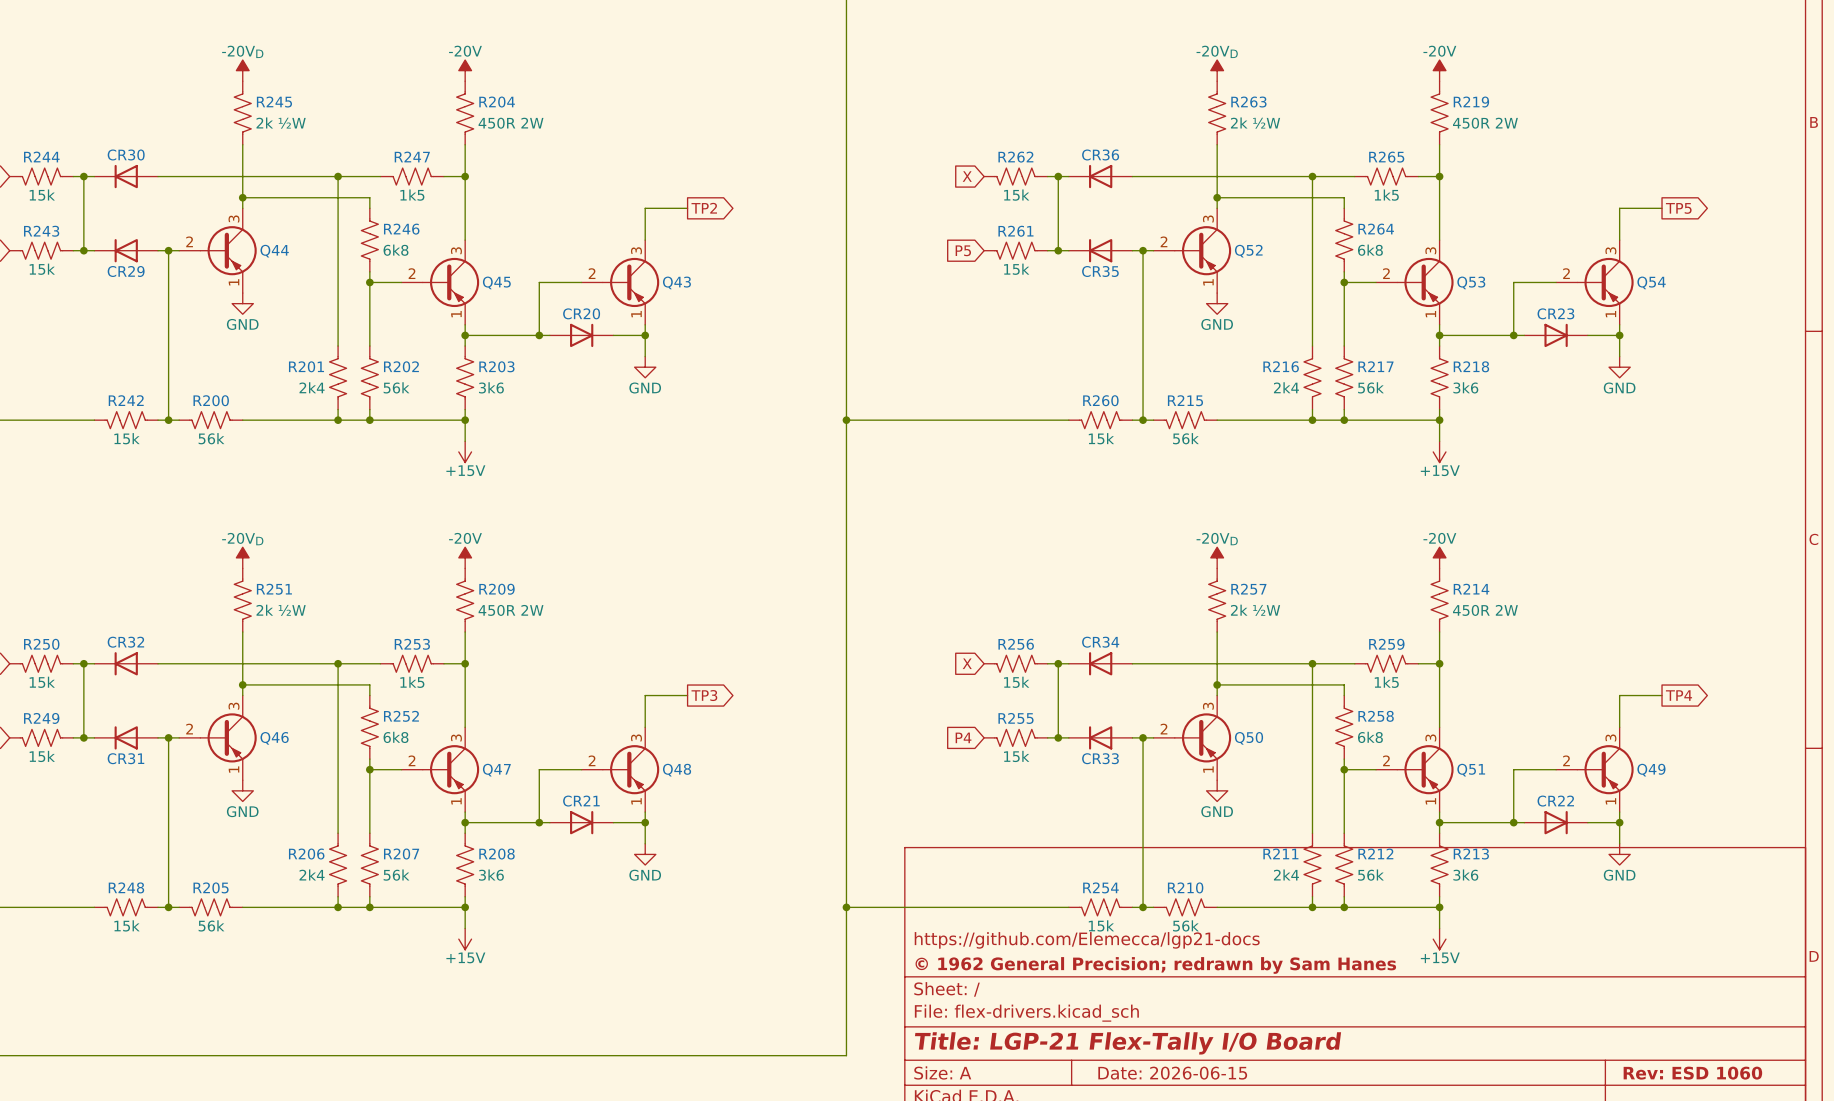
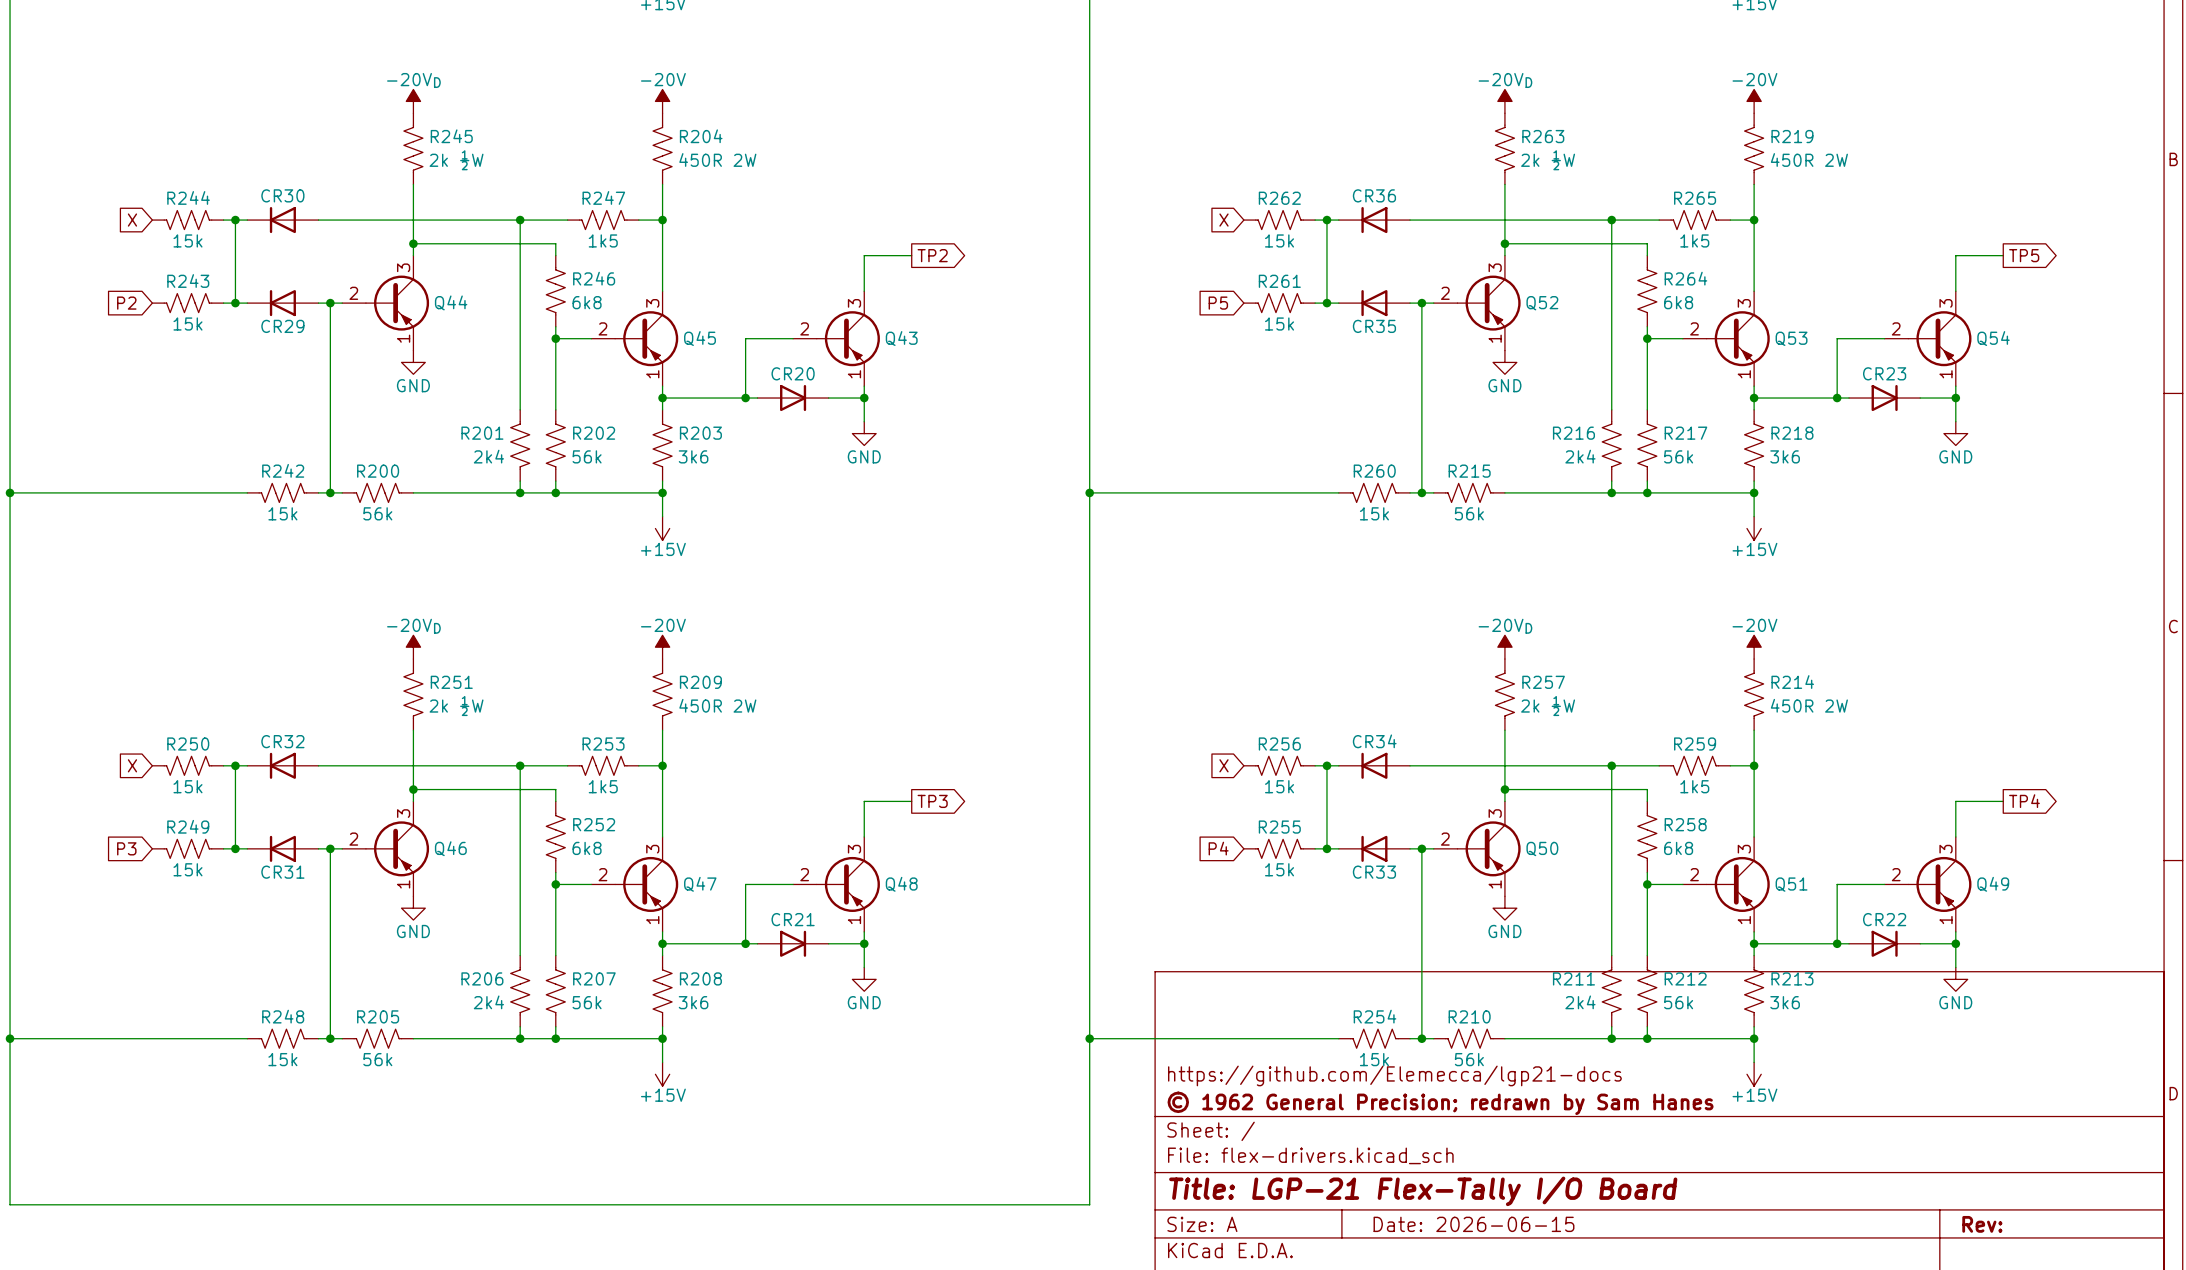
title block: Rev: ESD 1060 (1692, 1073) -> Rev: (1982, 1224)

